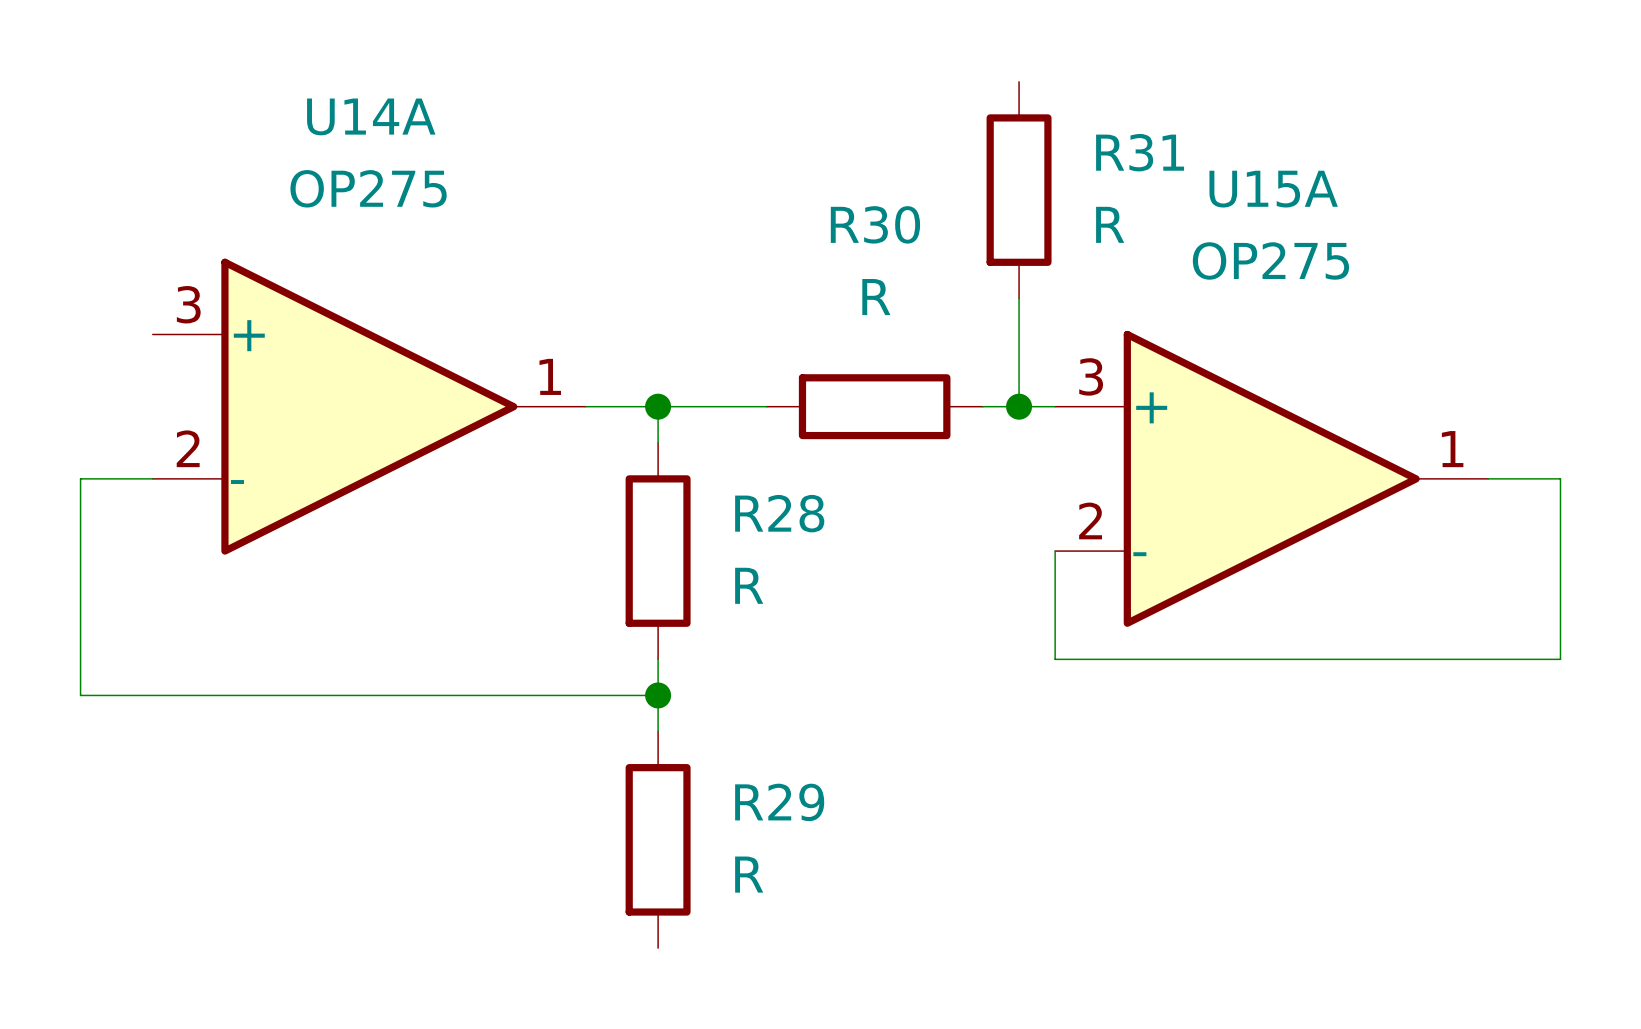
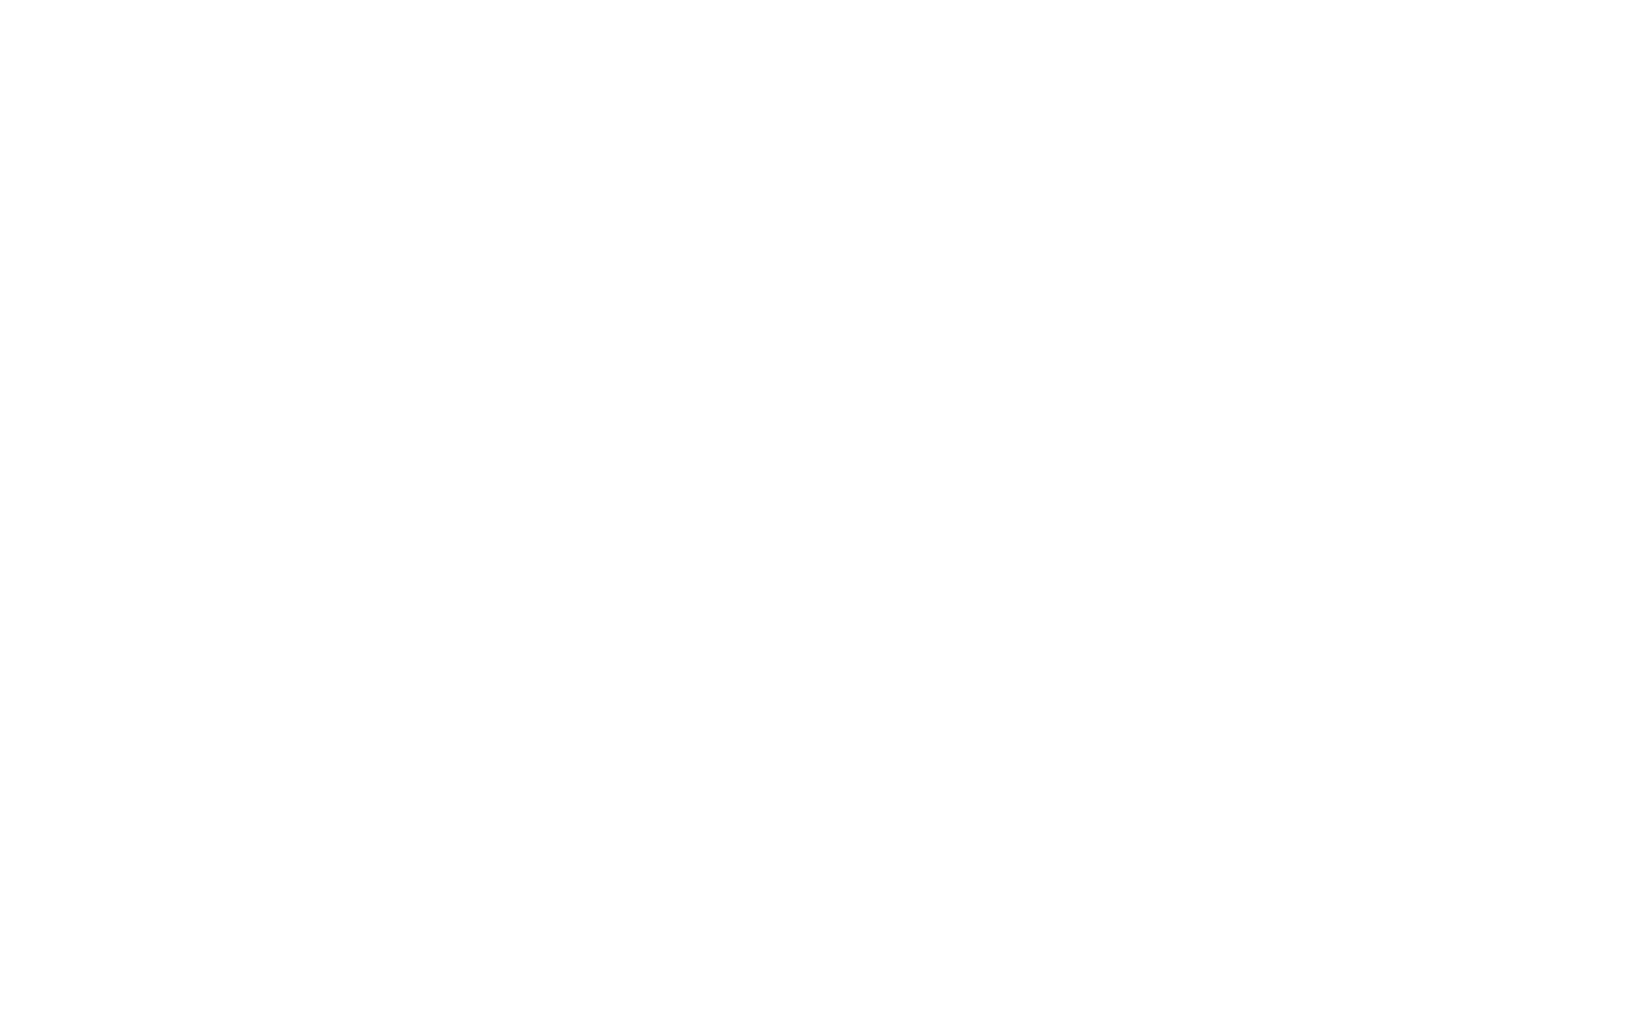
R31: R (1019, 190) -> none
wire: (1019, 298) (1019, 406) -> none
U14A: OP275 (369, 406) -> none
wire: (585, 406) (766, 406) -> none
wire: (658, 406) (658, 442) -> none
junction: (658, 406) -> none
R30: R (874, 406) -> none
wire: (982, 406) (1055, 406) -> none
junction: (1019, 406) -> none
wire: (152, 478) (80, 478) (80, 695) (658, 695) -> none
U15A: OP275 (1271, 478) -> none
wire: (1488, 478) (1560, 478) (1560, 659) (1055, 659) (1055, 551) -> none
R28: R (658, 551) -> none
wire: (658, 659) (658, 731) -> none
junction: (658, 695) -> none
R29: R (658, 839) -> none

